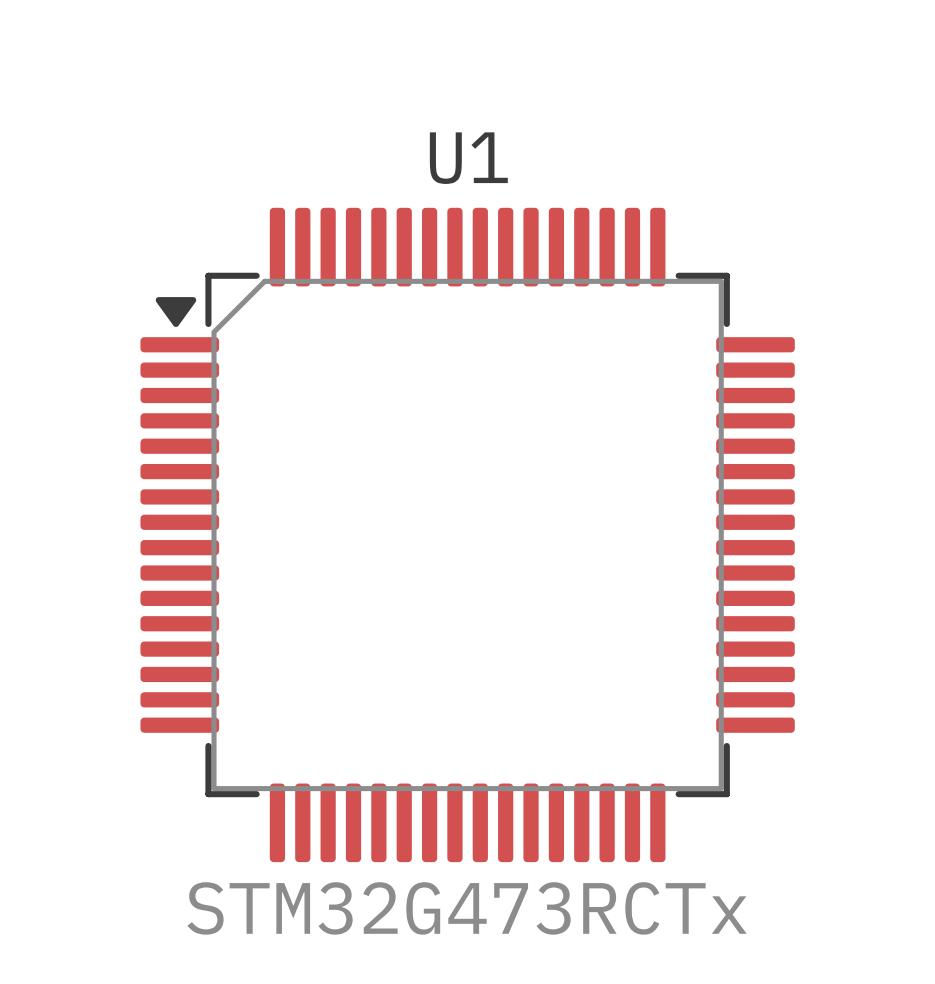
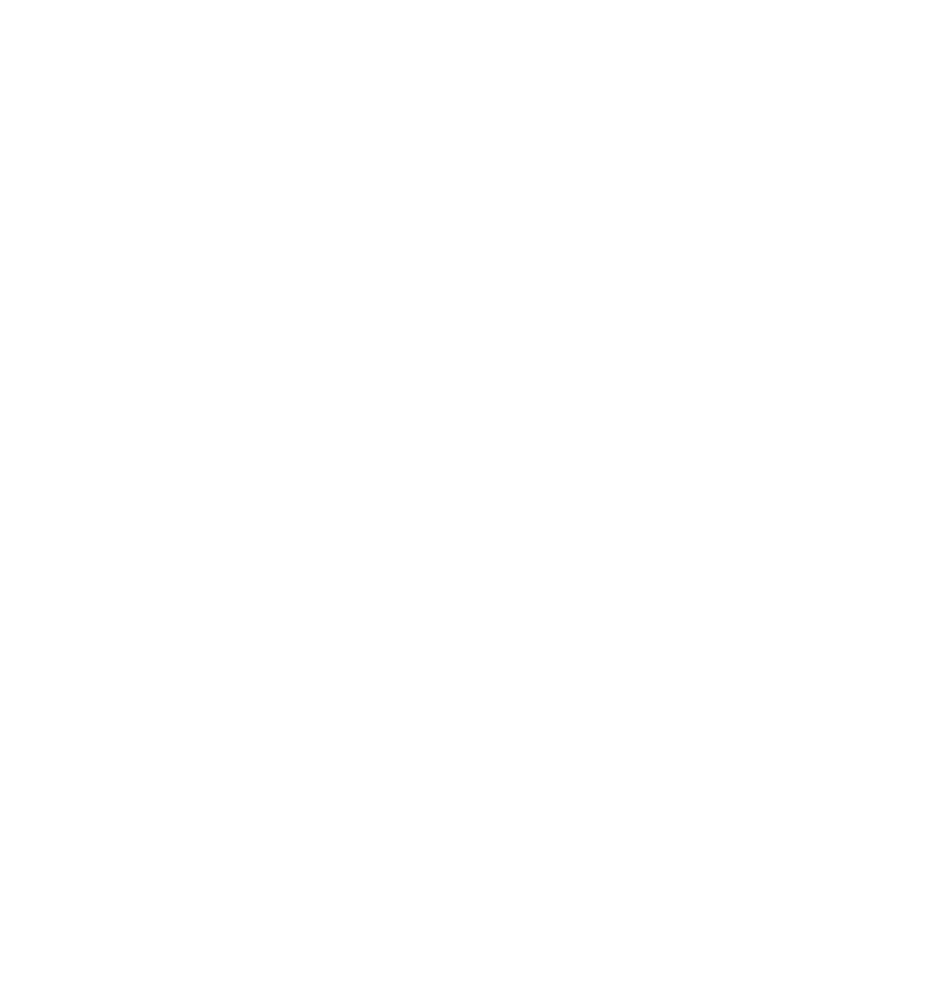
U1: STM32G473RCTx (467, 534) -> none

